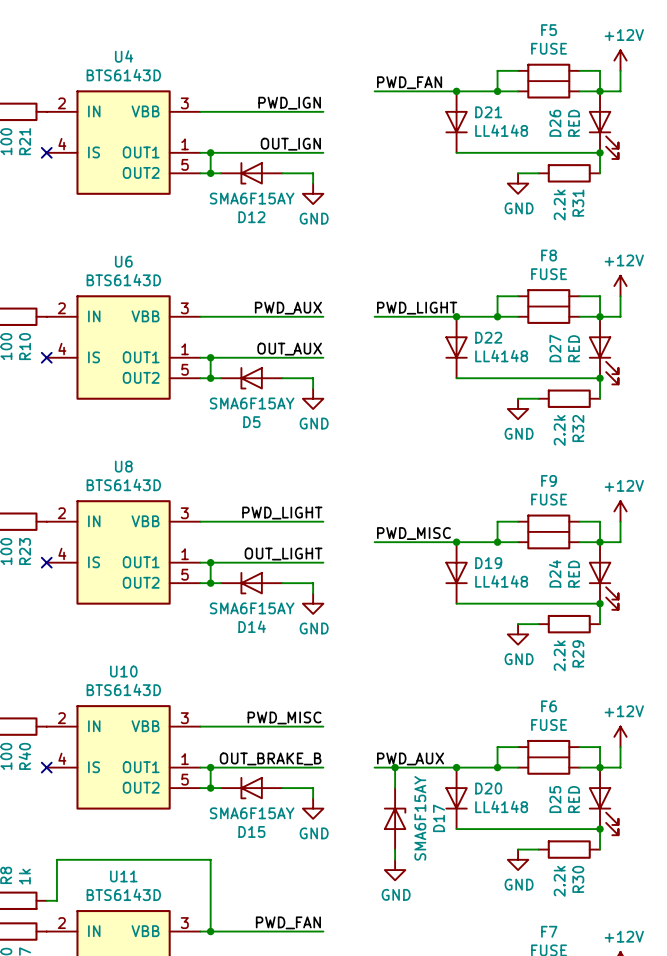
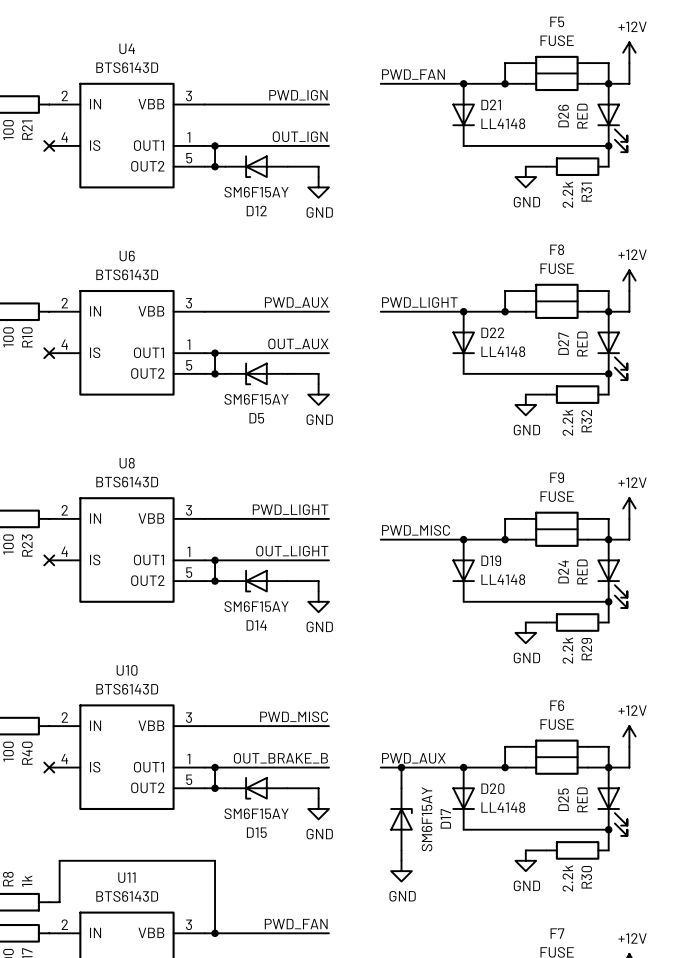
D12 value: SMA6F15AY (252, 198) -> SM6F15AY (256, 192)
D5 value: SMA6F15AY (252, 403) -> SM6F15AY (256, 399)
D14 value: SMA6F15AY (252, 608) -> SM6F15AY (256, 606)
D15 value: SMA6F15AY (252, 813) -> SM6F15AY (256, 813)
D17 value: SMA6F15AY (420, 818) -> SM6F15AY (427, 819)

